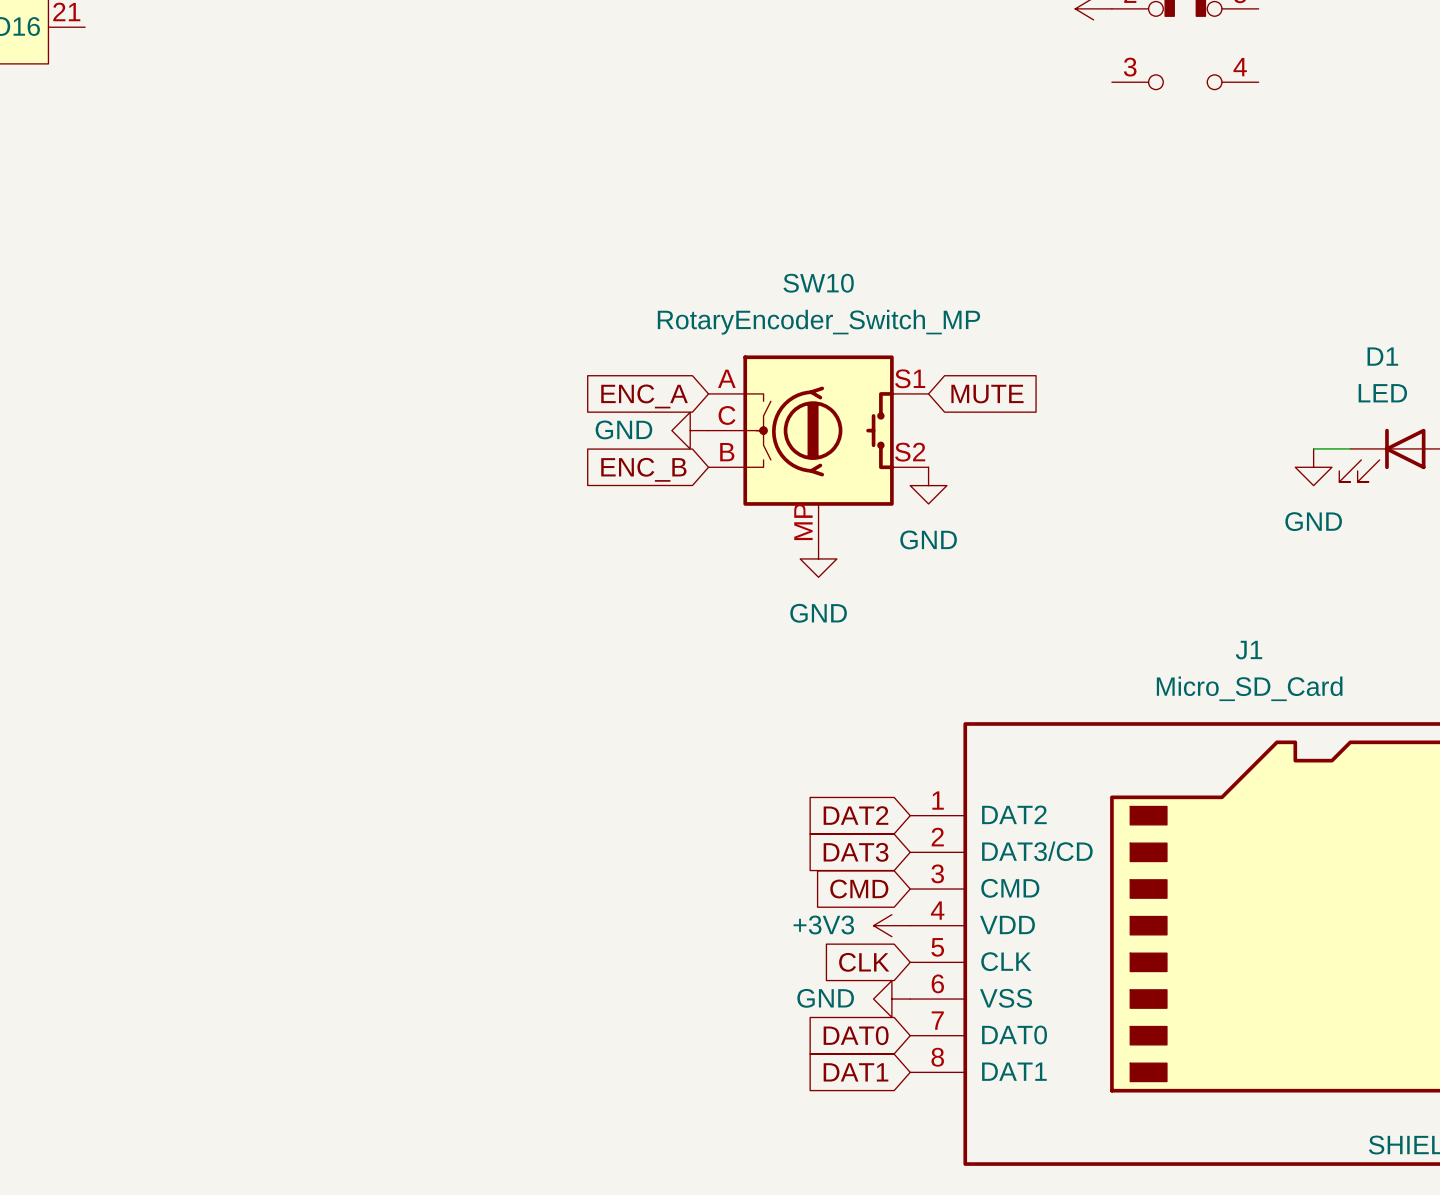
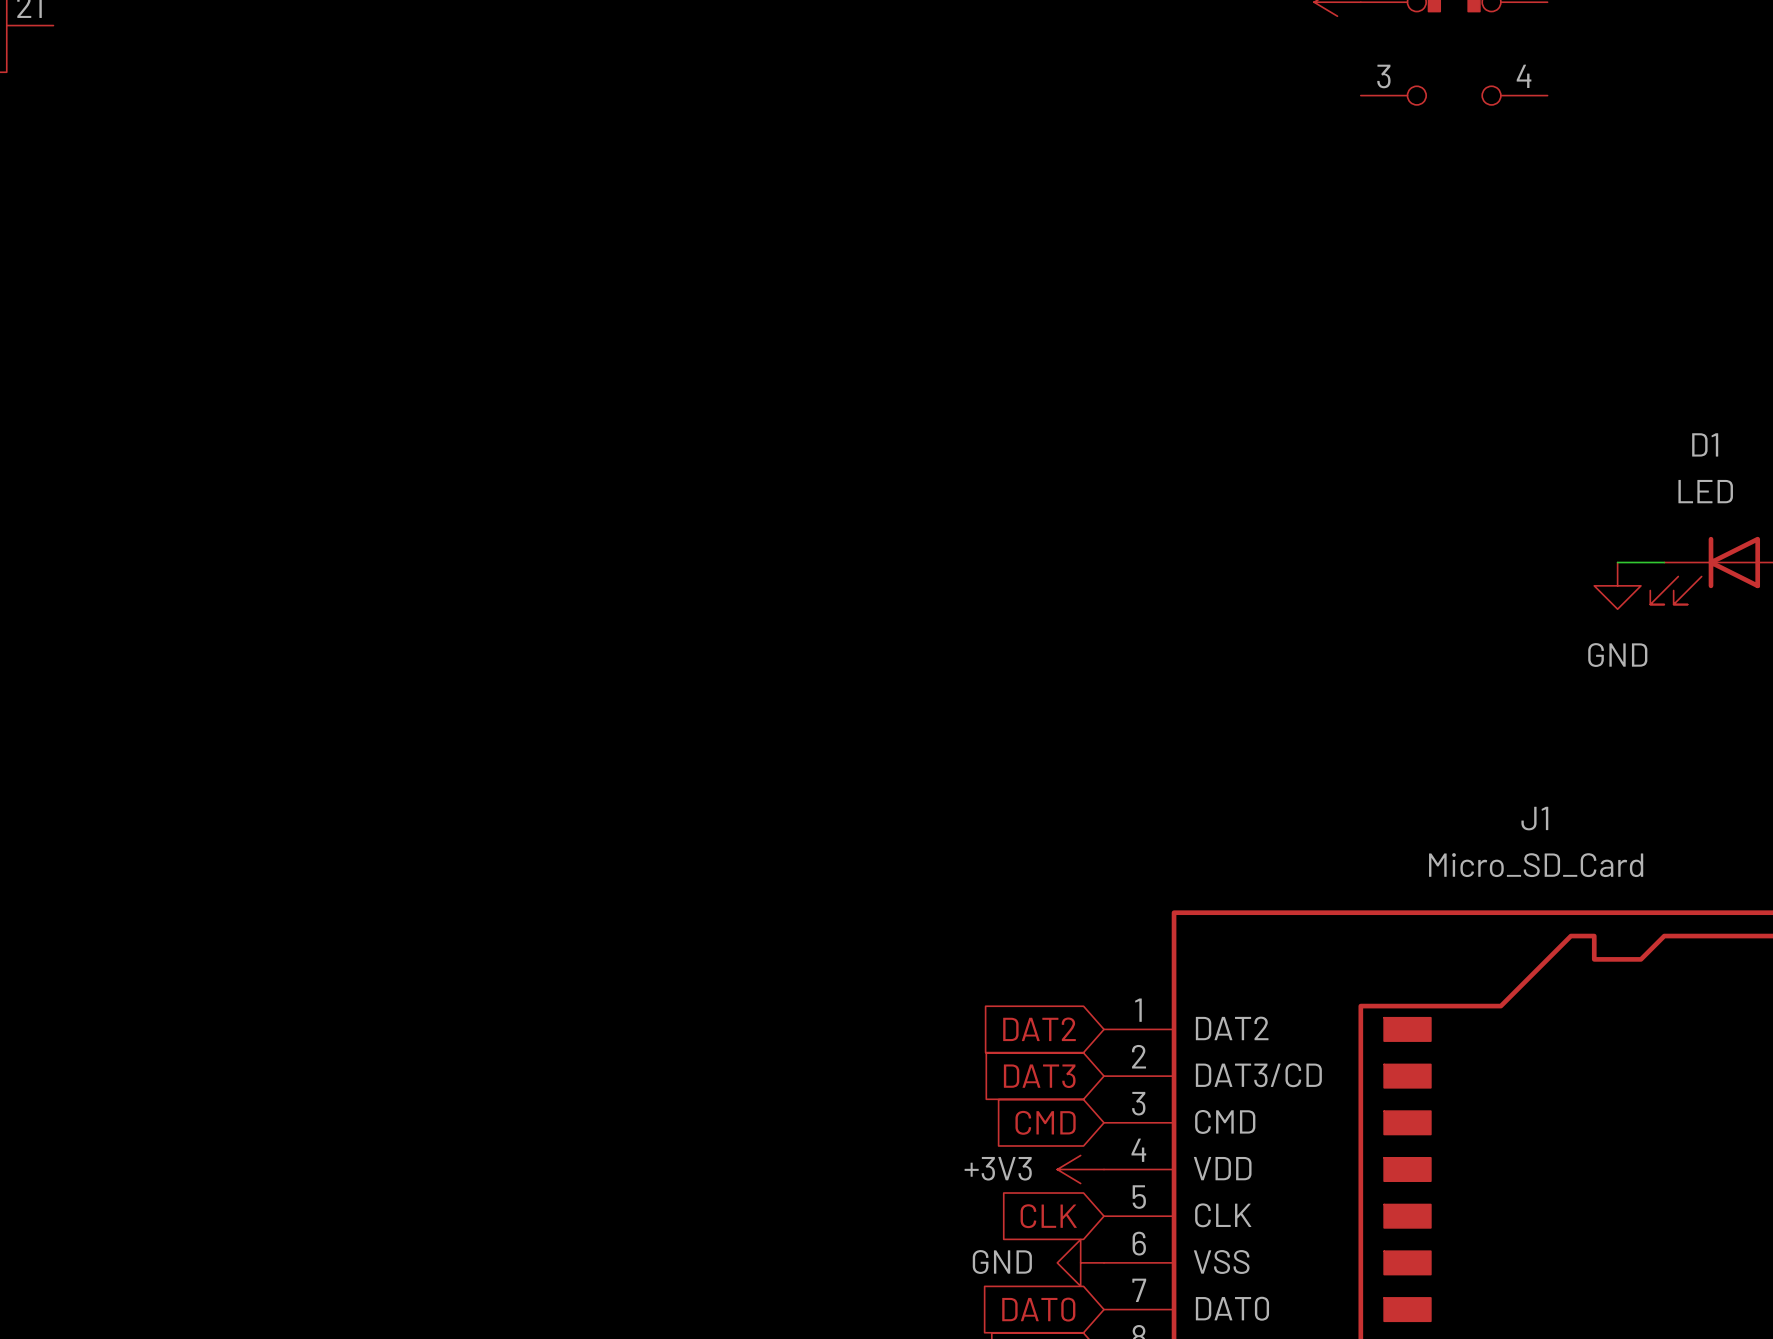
global label: MUTE (987, 394) -> none
global label: ENC_A (644, 396) -> none
power symbol: GND (690, 430) -> none
SW10: RotaryEncoder_Switch_MP (818, 448) -> none
global label: ENC_B (643, 469) -> none
power symbol: GND (928, 485) -> none
power symbol: GND (818, 558) -> none

